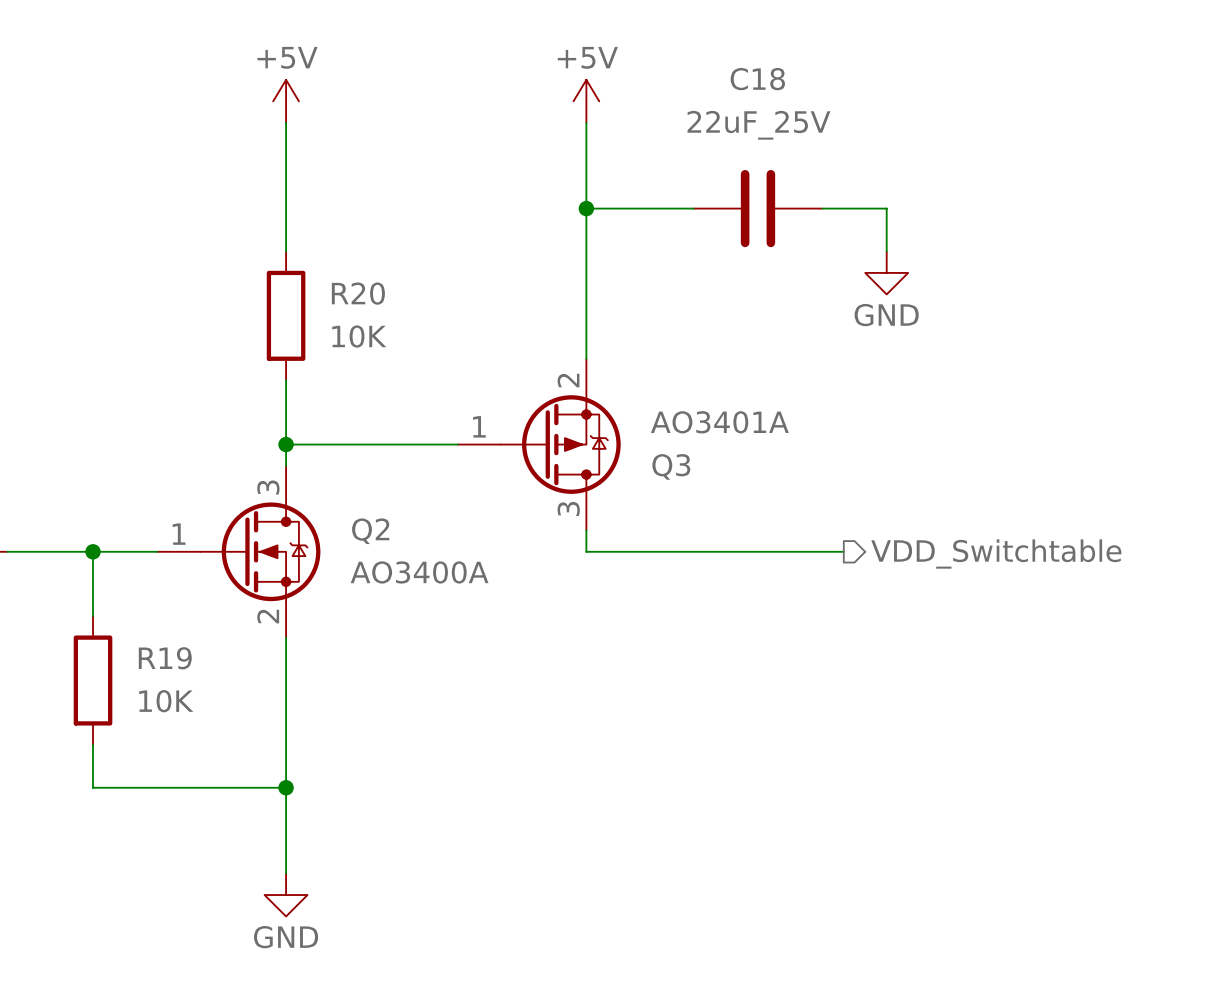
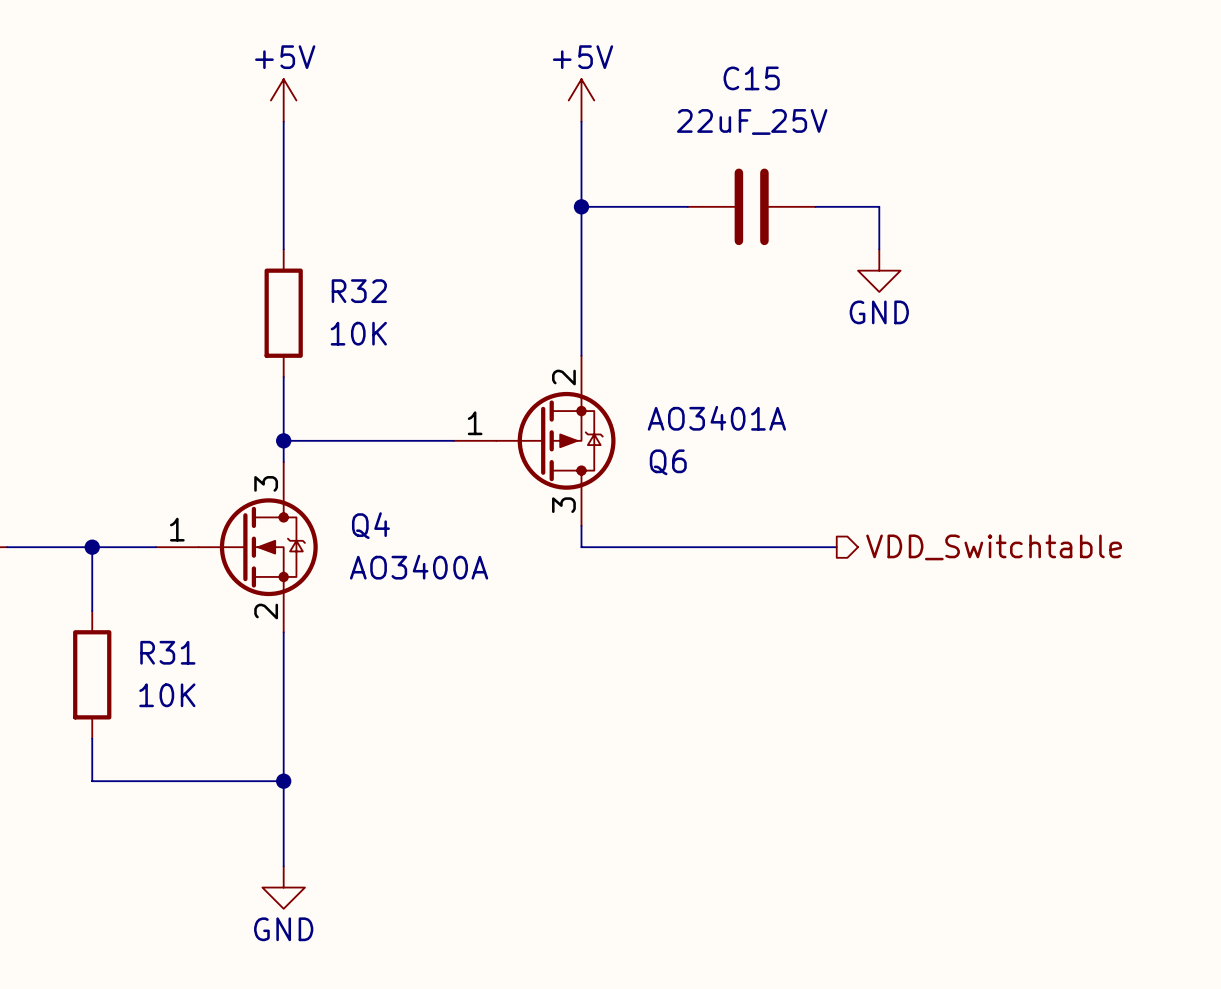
C18 name: C18 (757, 79) -> C15 (751, 78)
R20 name: R20 (358, 293) -> R32 (359, 291)
Q3 name: Q3 (671, 466) -> Q6 (668, 462)
Q2 name: Q2 (370, 531) -> Q4 (370, 525)
R19 name: R19 (165, 658) -> R31 (167, 652)

